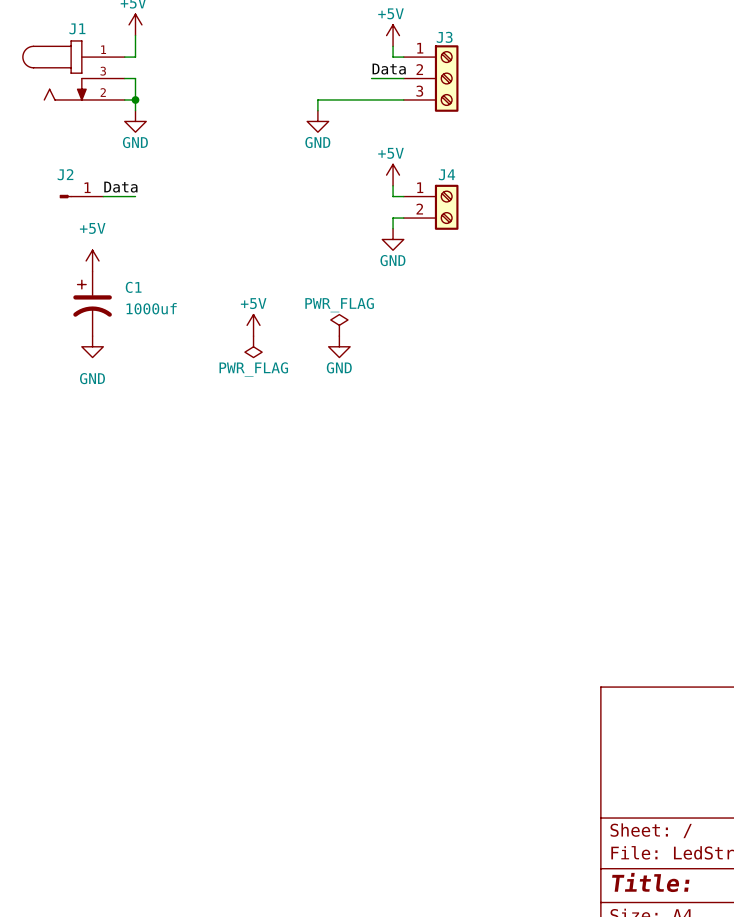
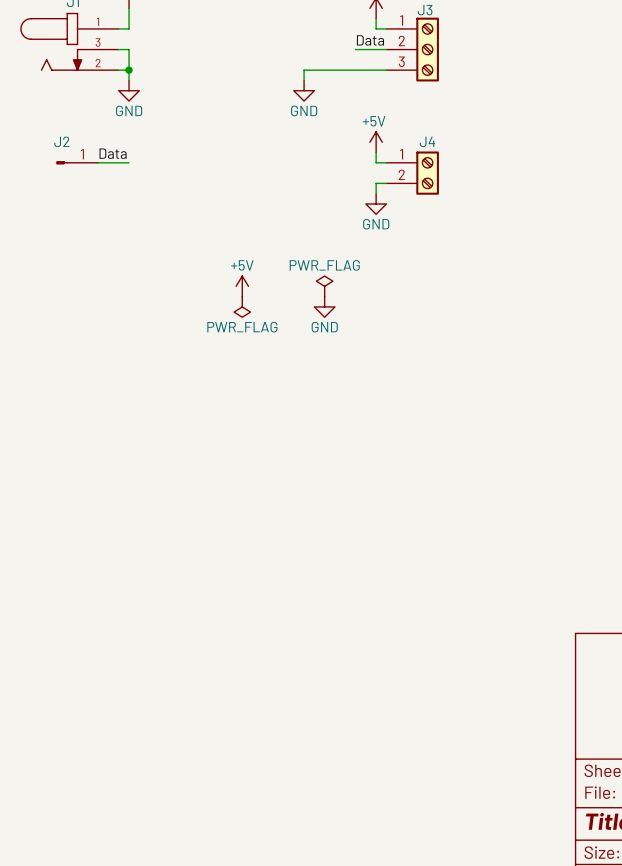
power symbol: +5V (92, 260) -> none
C1: 1000uf (92, 303) -> none
power symbol: GND (92, 346) -> none

